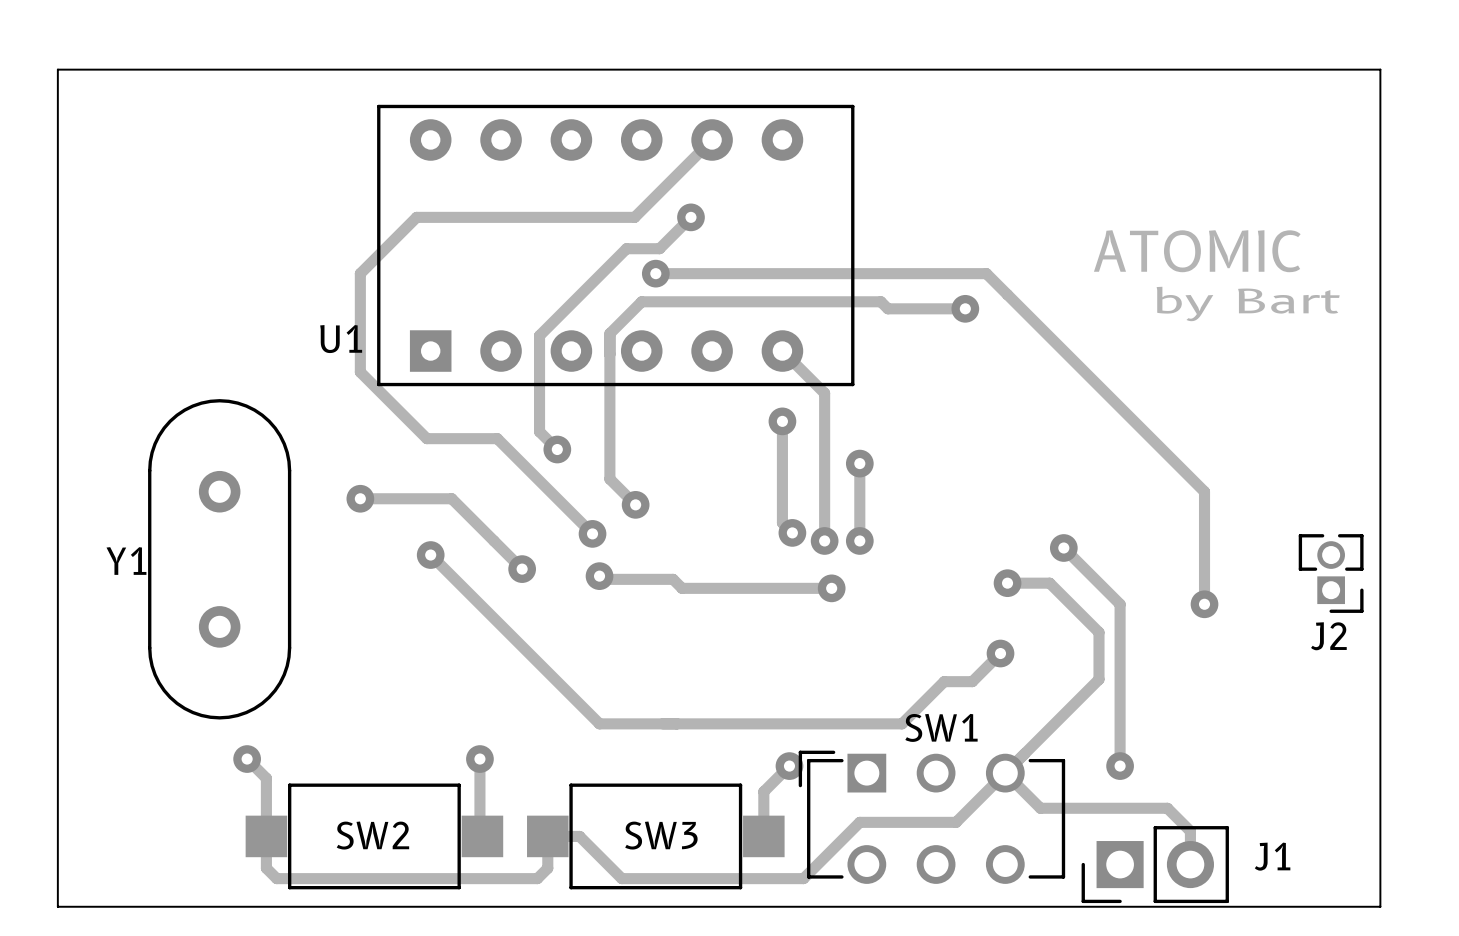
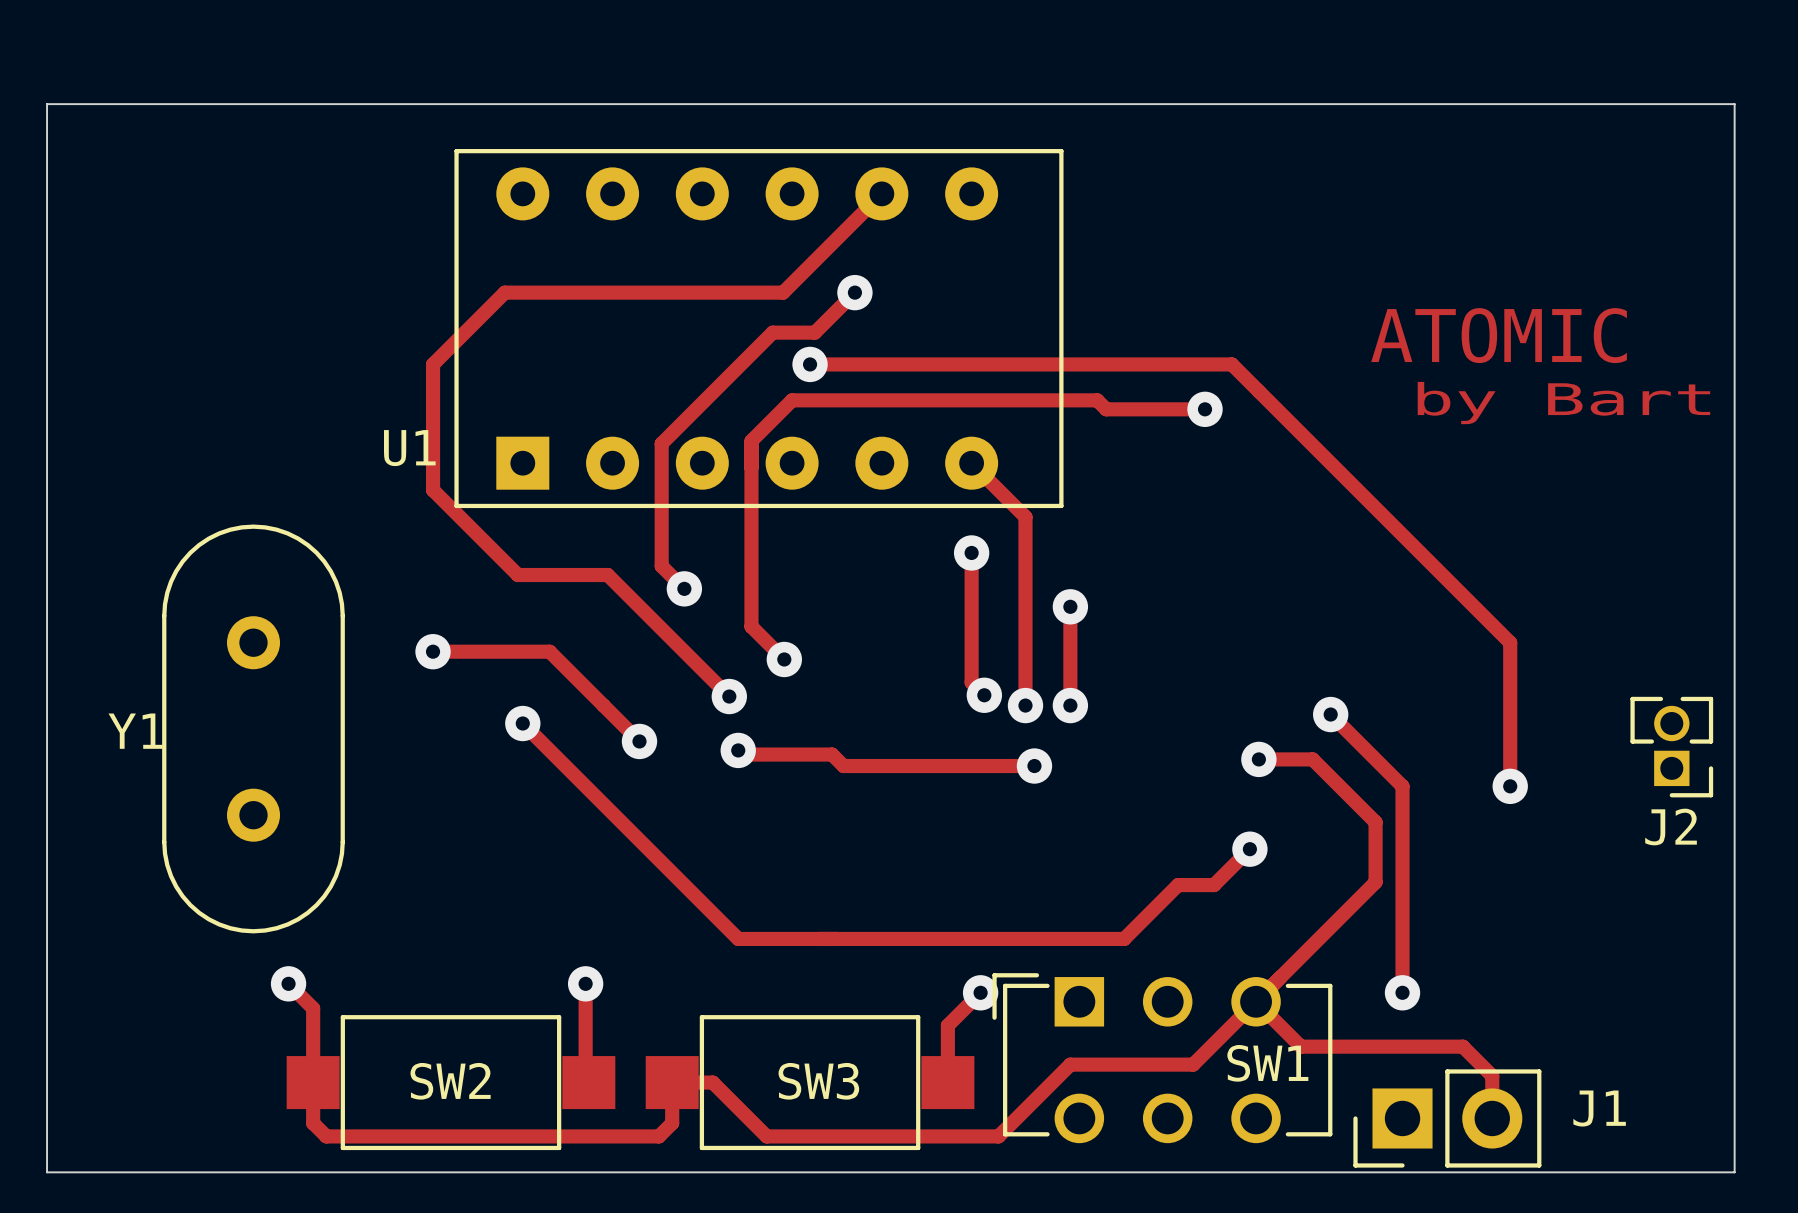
SW1 name position: SW1 (941, 727) -> SW1 (1267, 1063)

